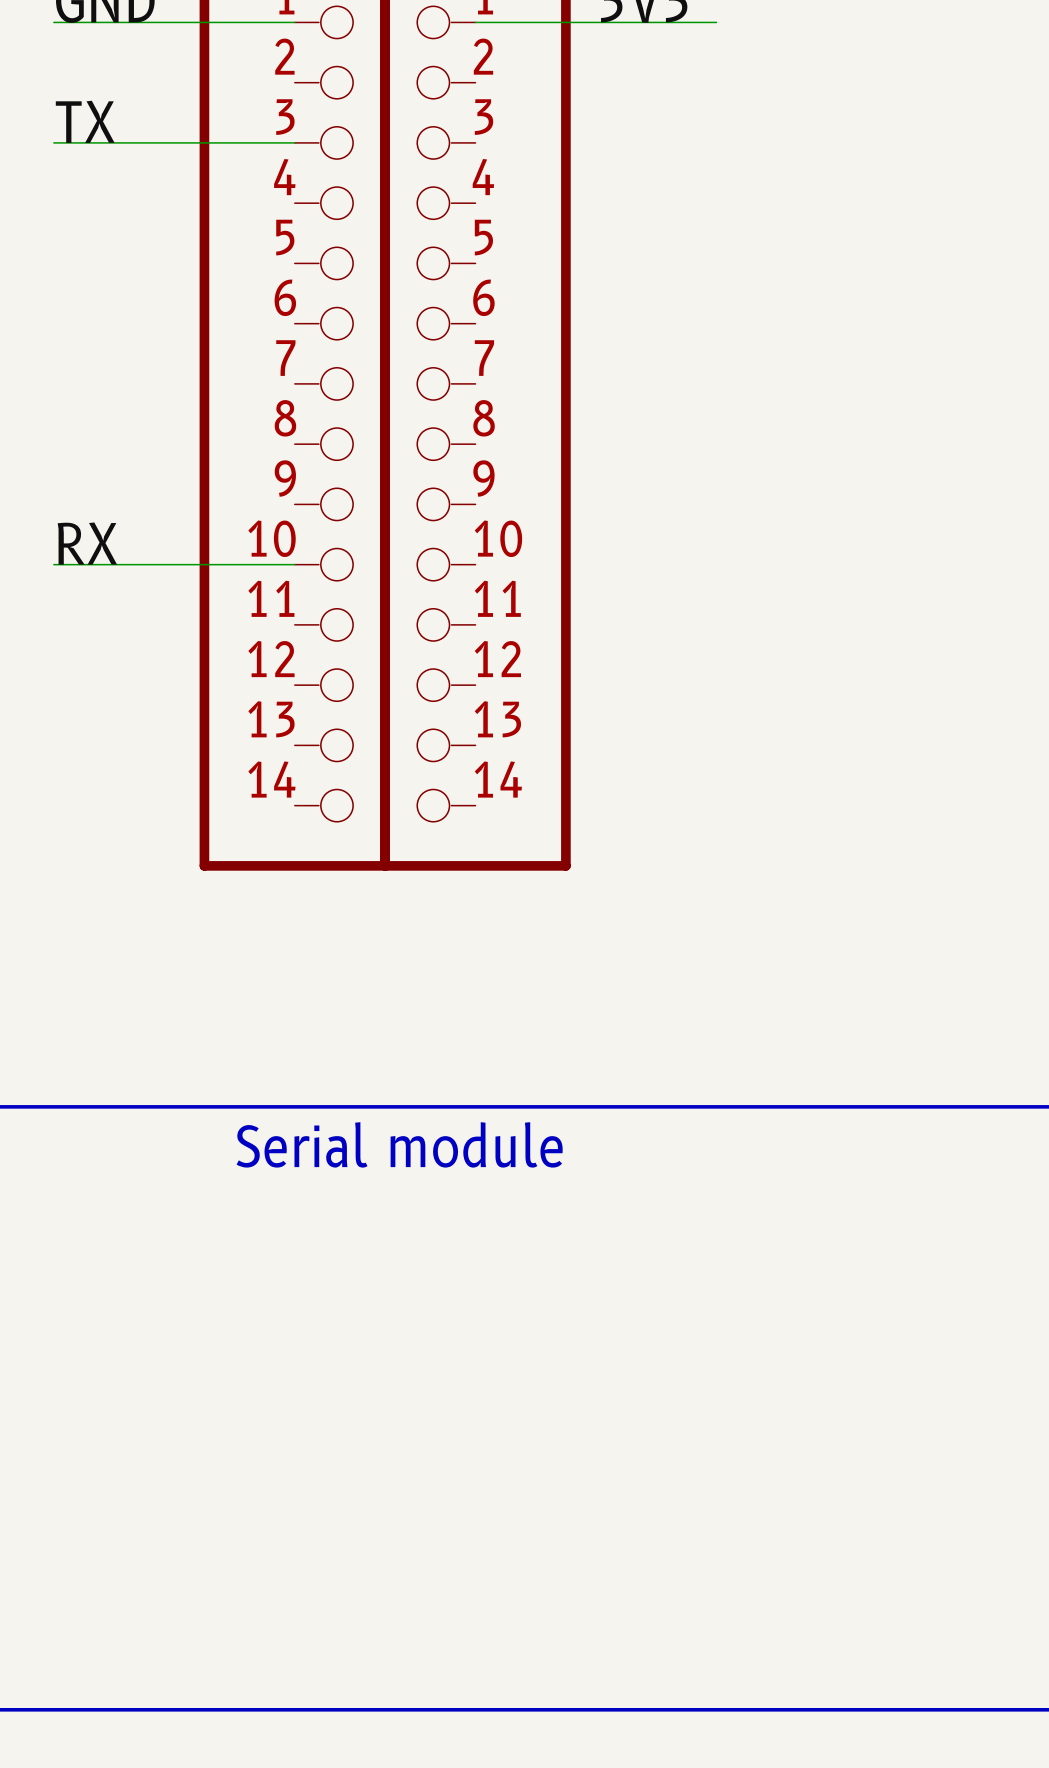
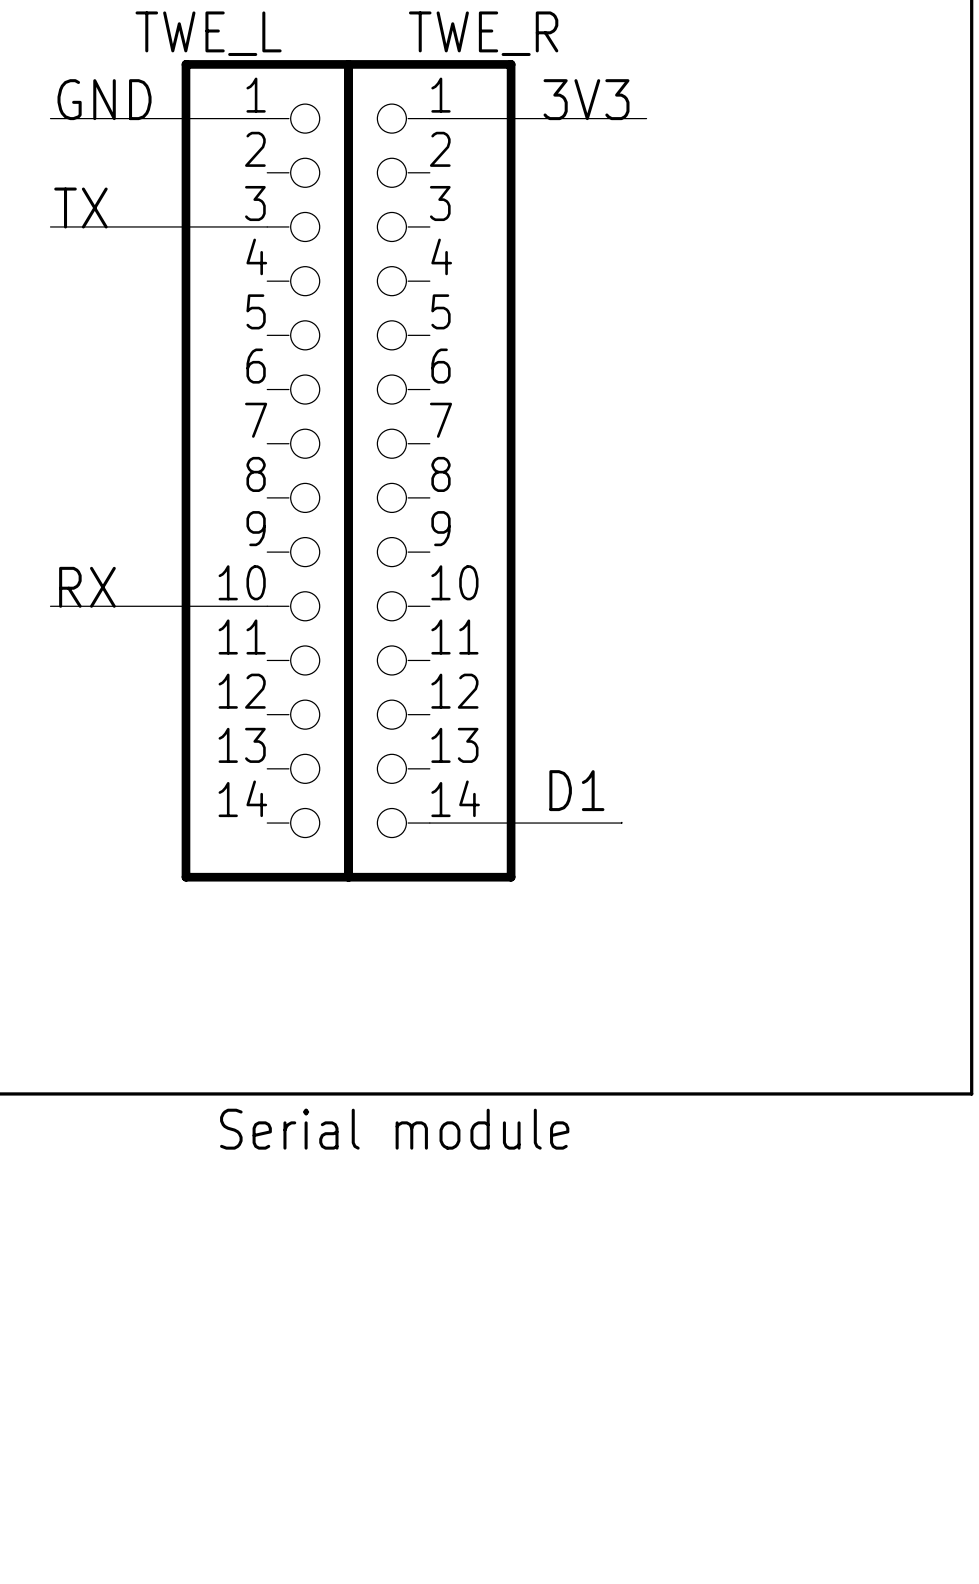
label: none -> D1 (576, 790)
wire: none -> (621, 822) (429, 823)

